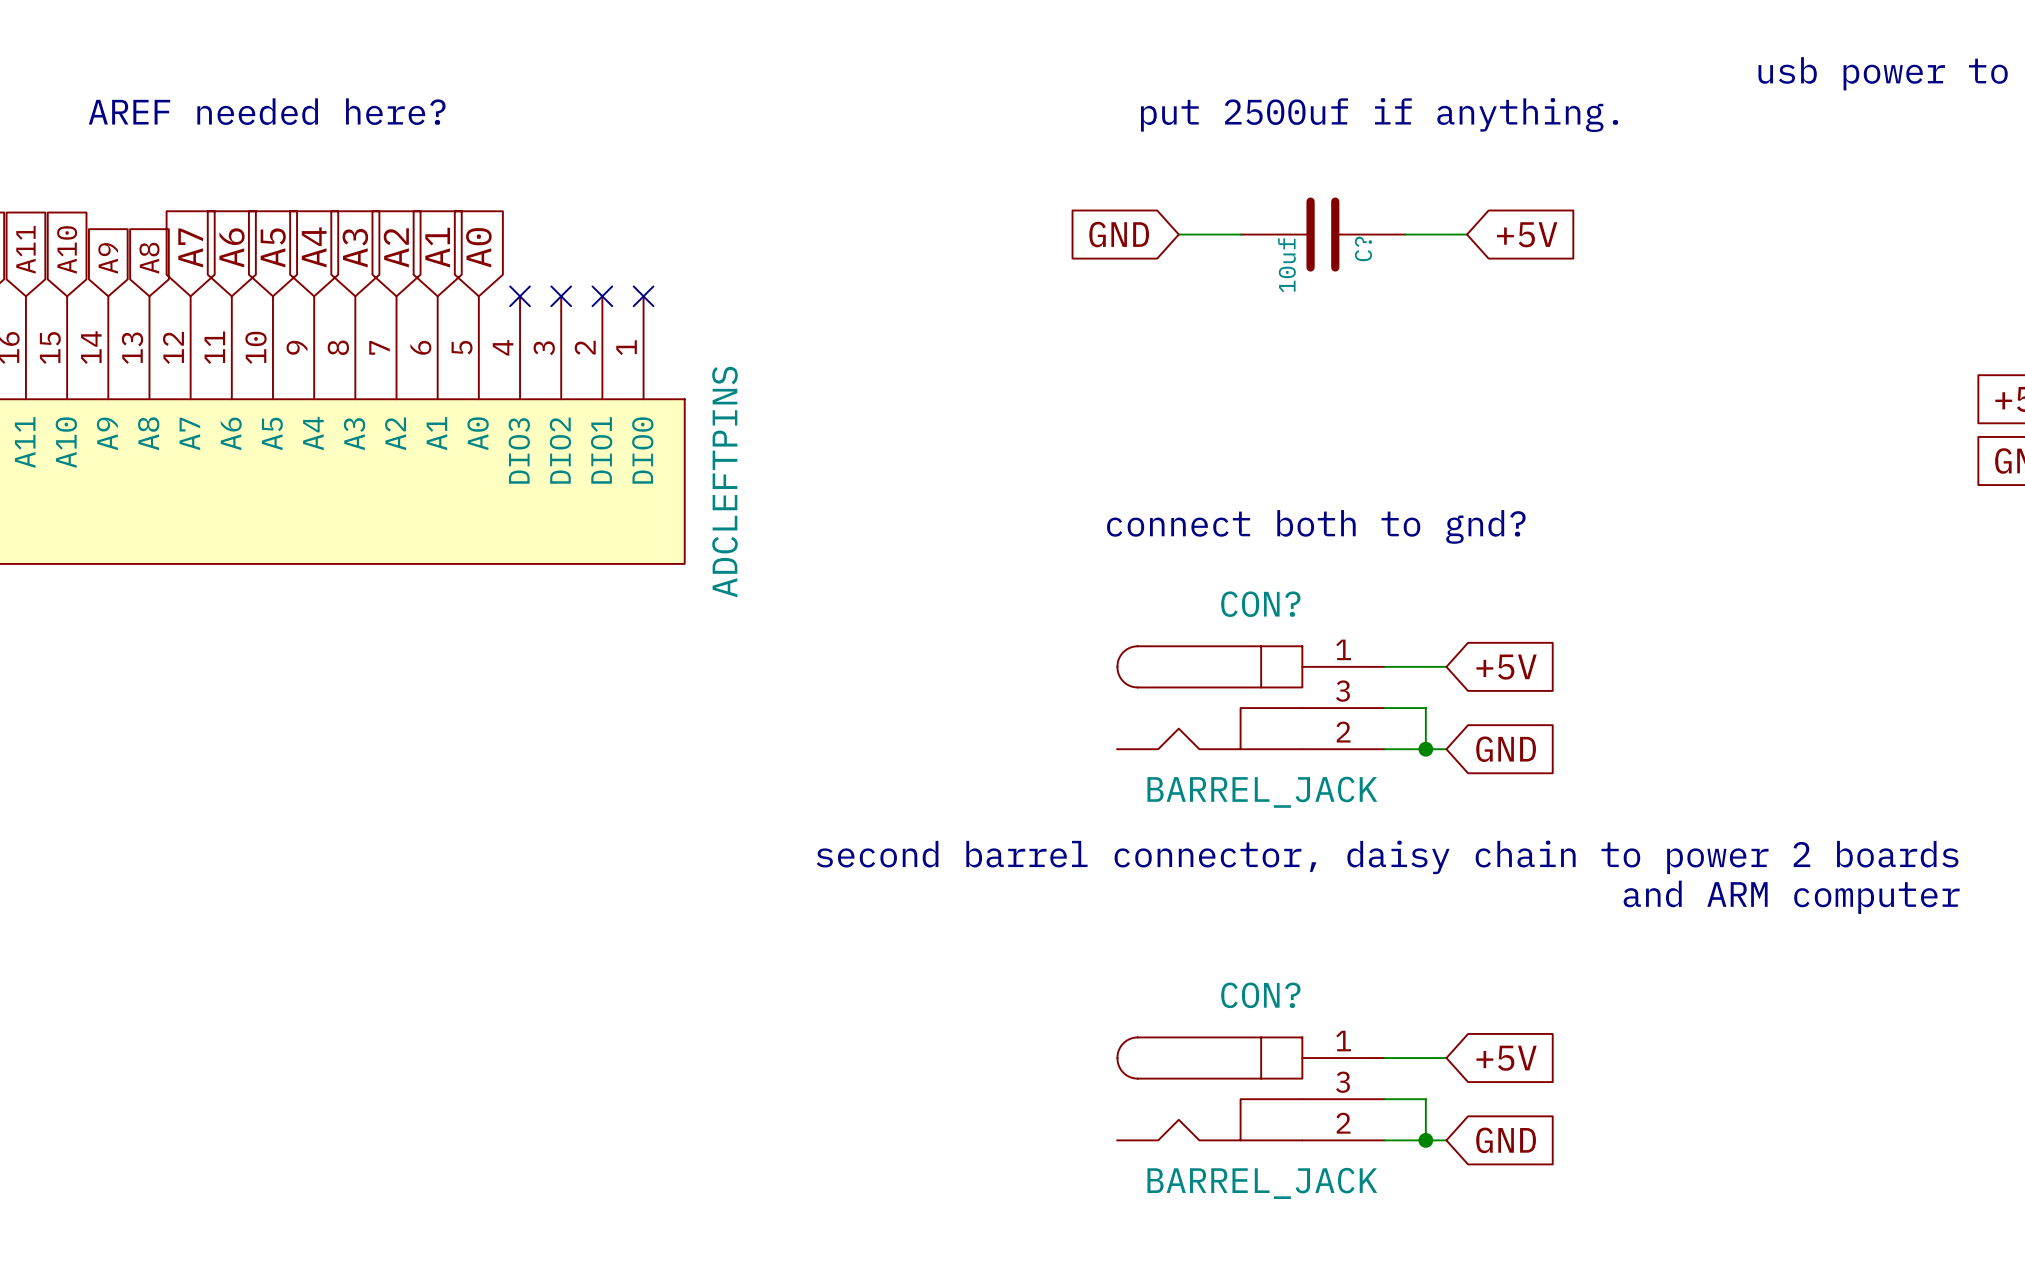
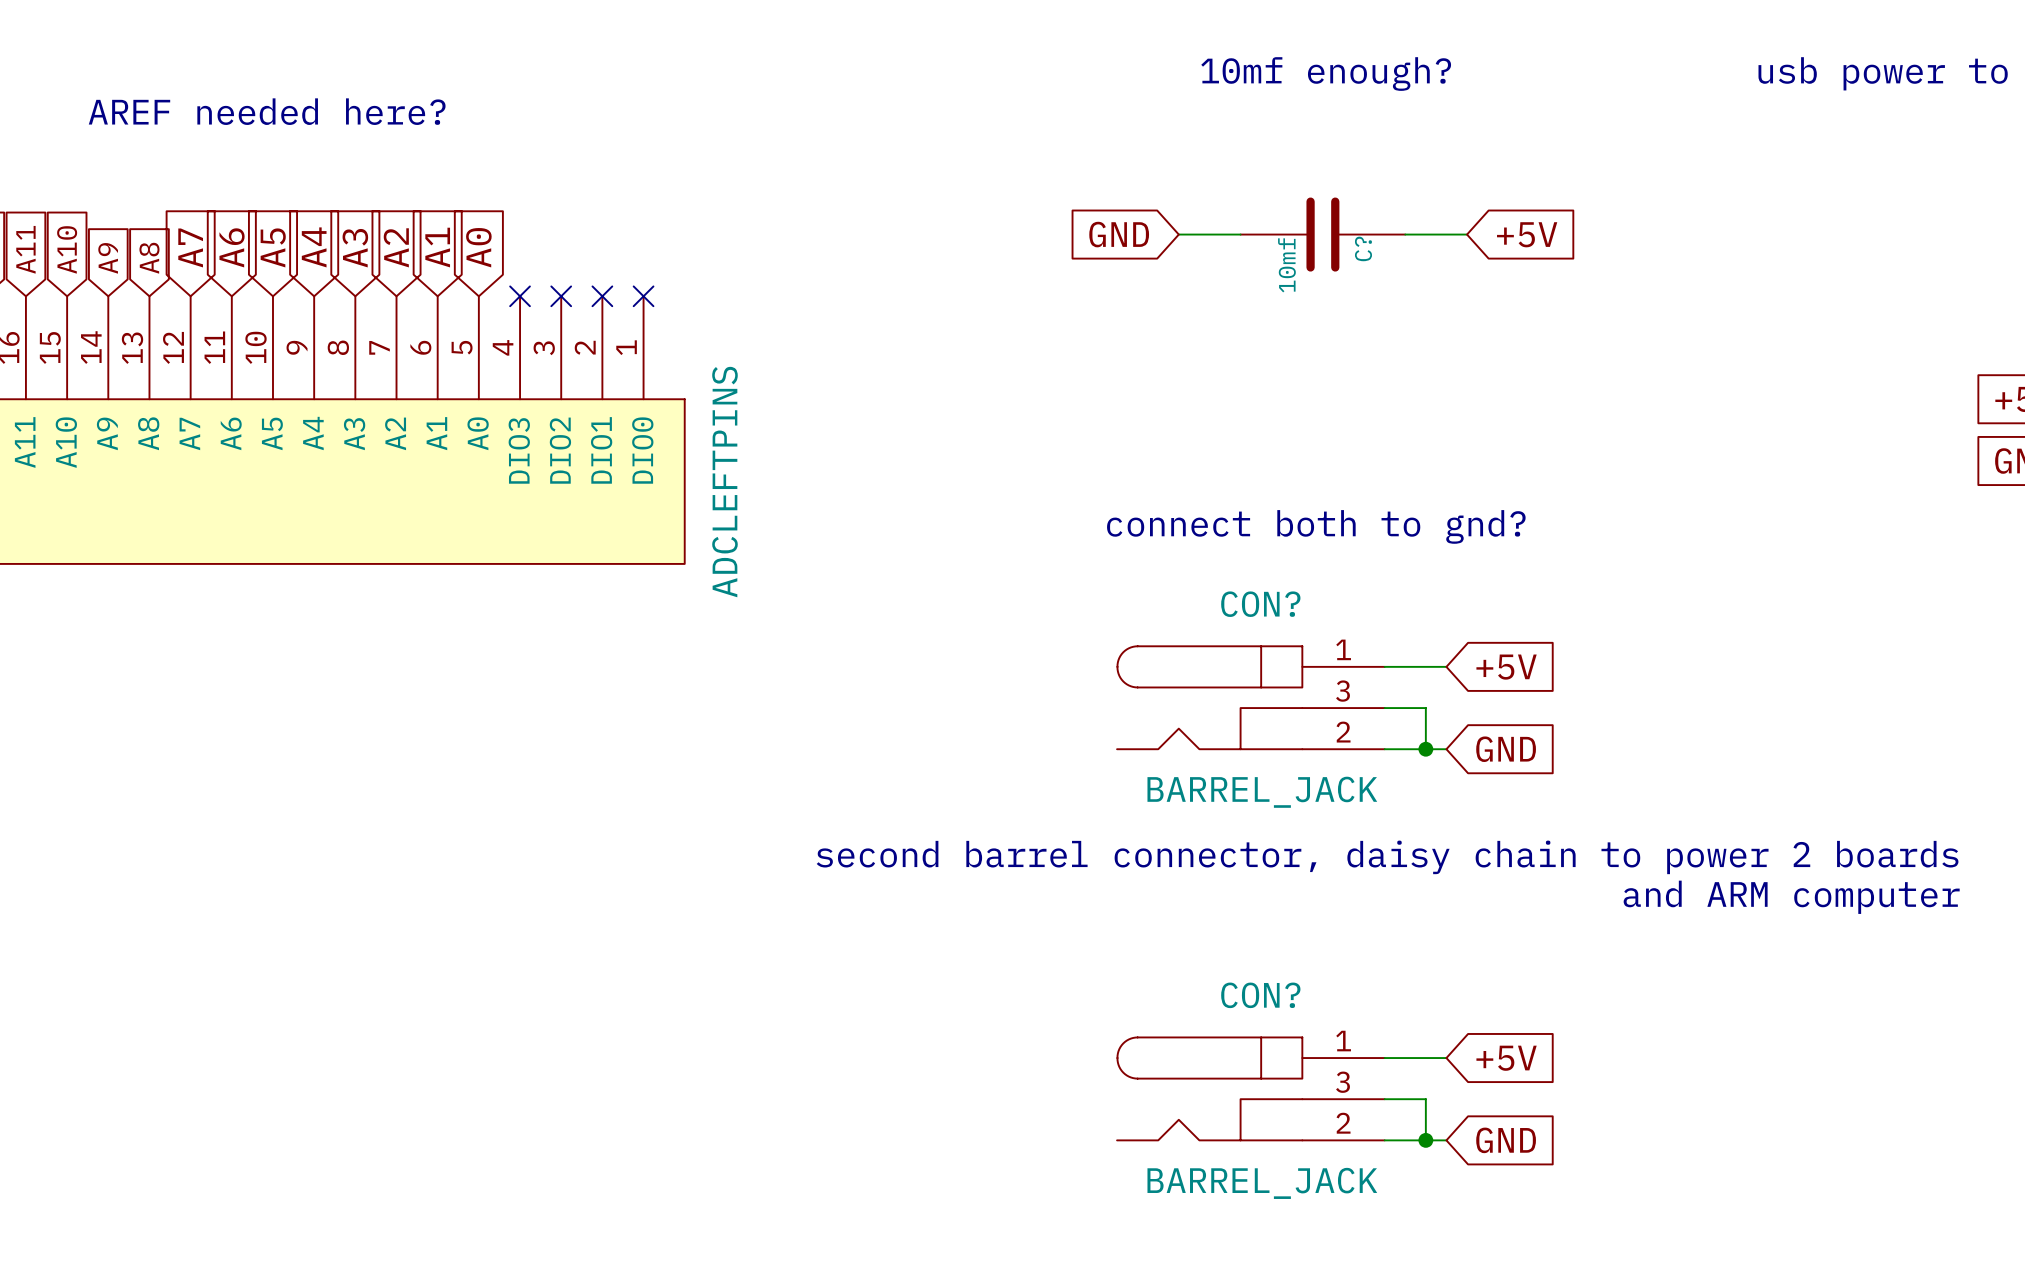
text: none -> 10mf enough? (1326, 74)
text: put 2500uf if anything. (1379, 115) -> none
C? value: 10uf (1286, 265) -> 10mf (1286, 265)

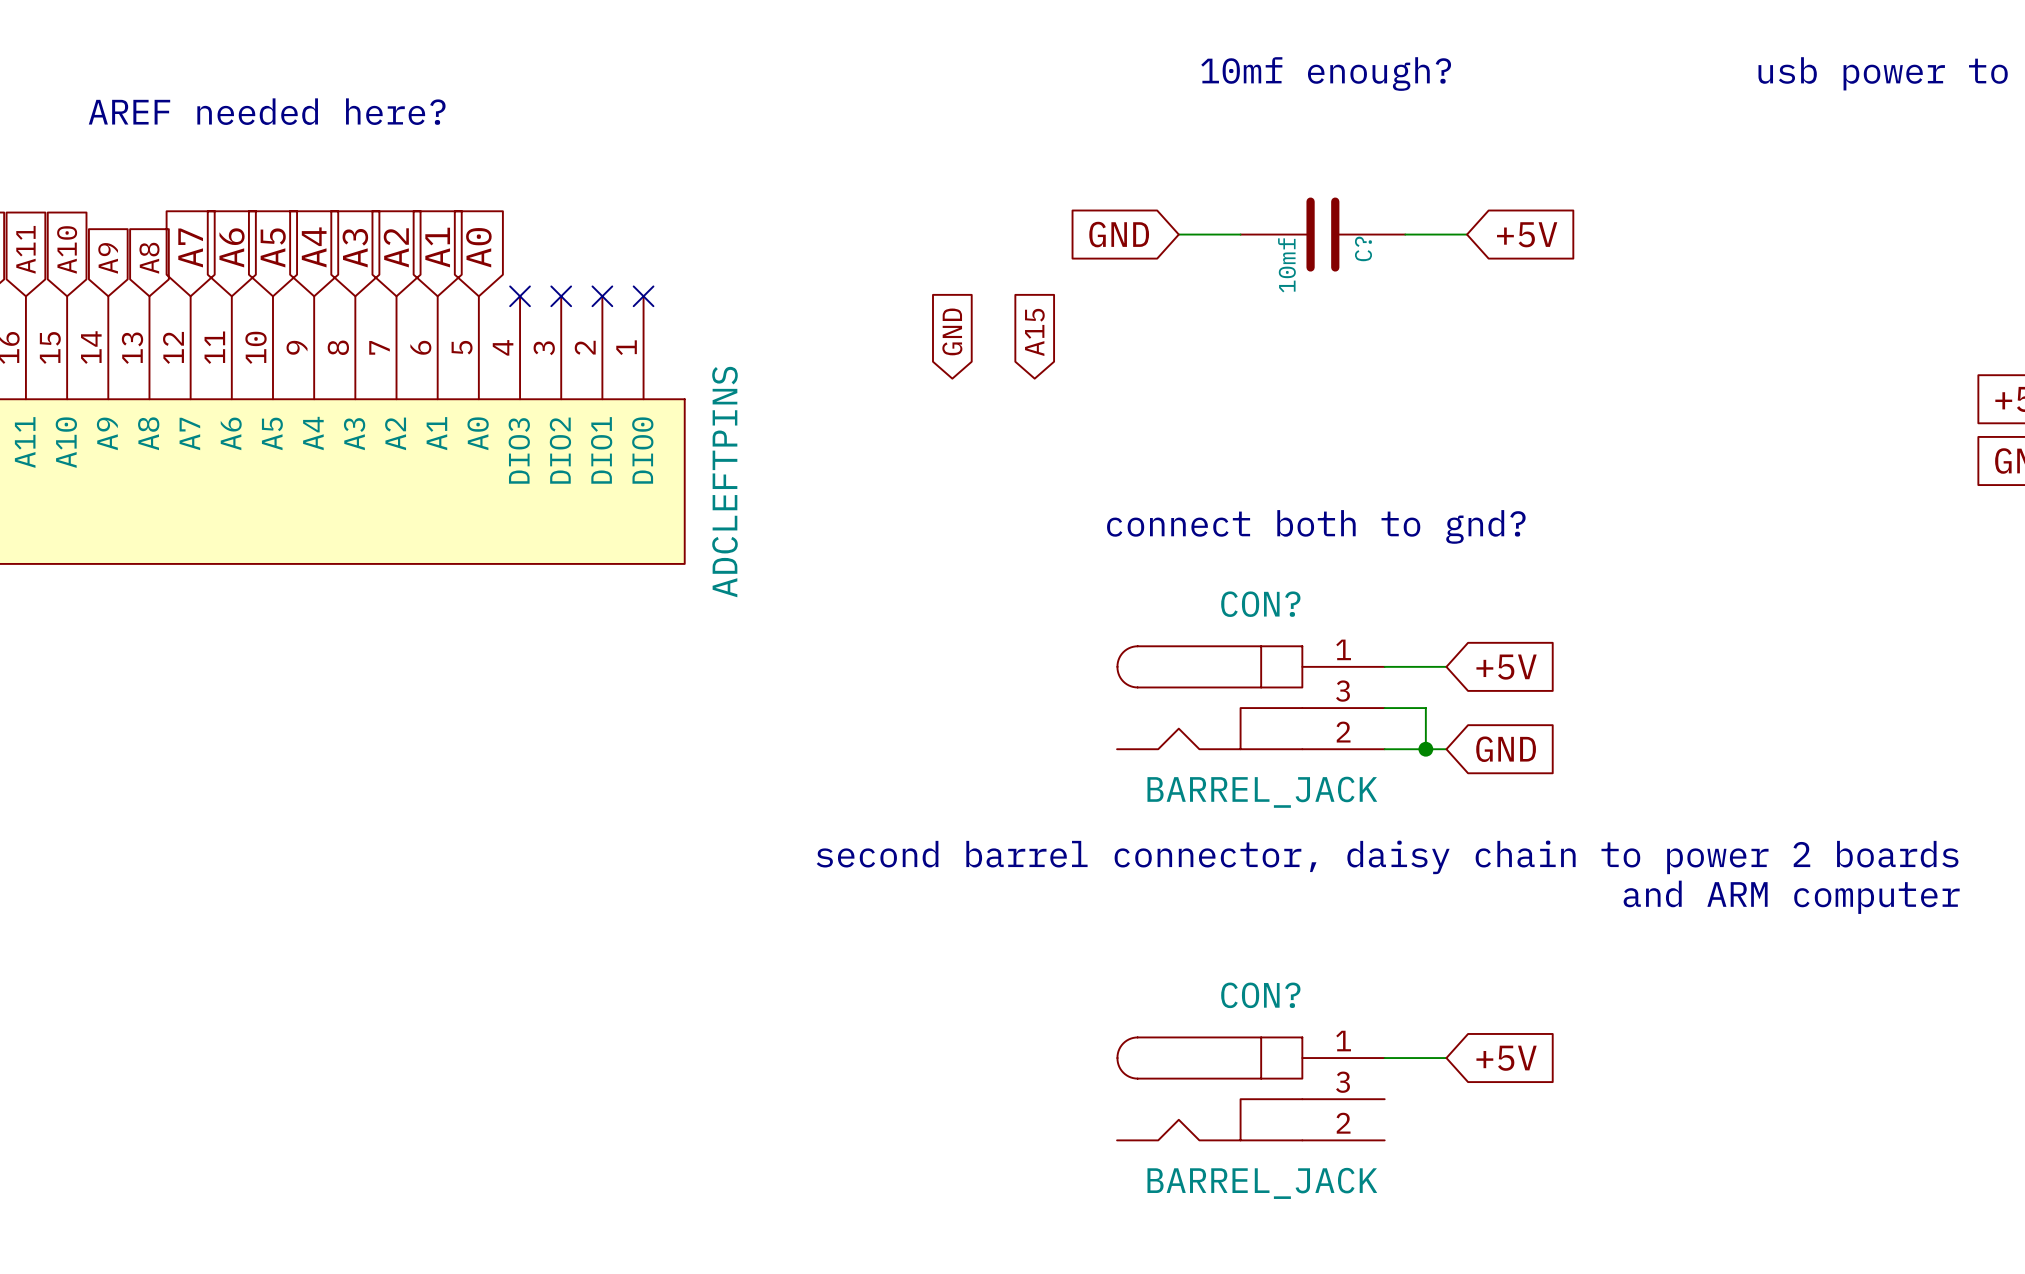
global label: none -> GND (952, 331)
global label: none -> A15 (1034, 332)
wire: (1384, 1099) (1425, 1099) (1425, 1140) -> none
wire: (1384, 1140) (1446, 1140) -> none
junction: (1425, 1140) -> none
global label: GND (1506, 1140) -> none

